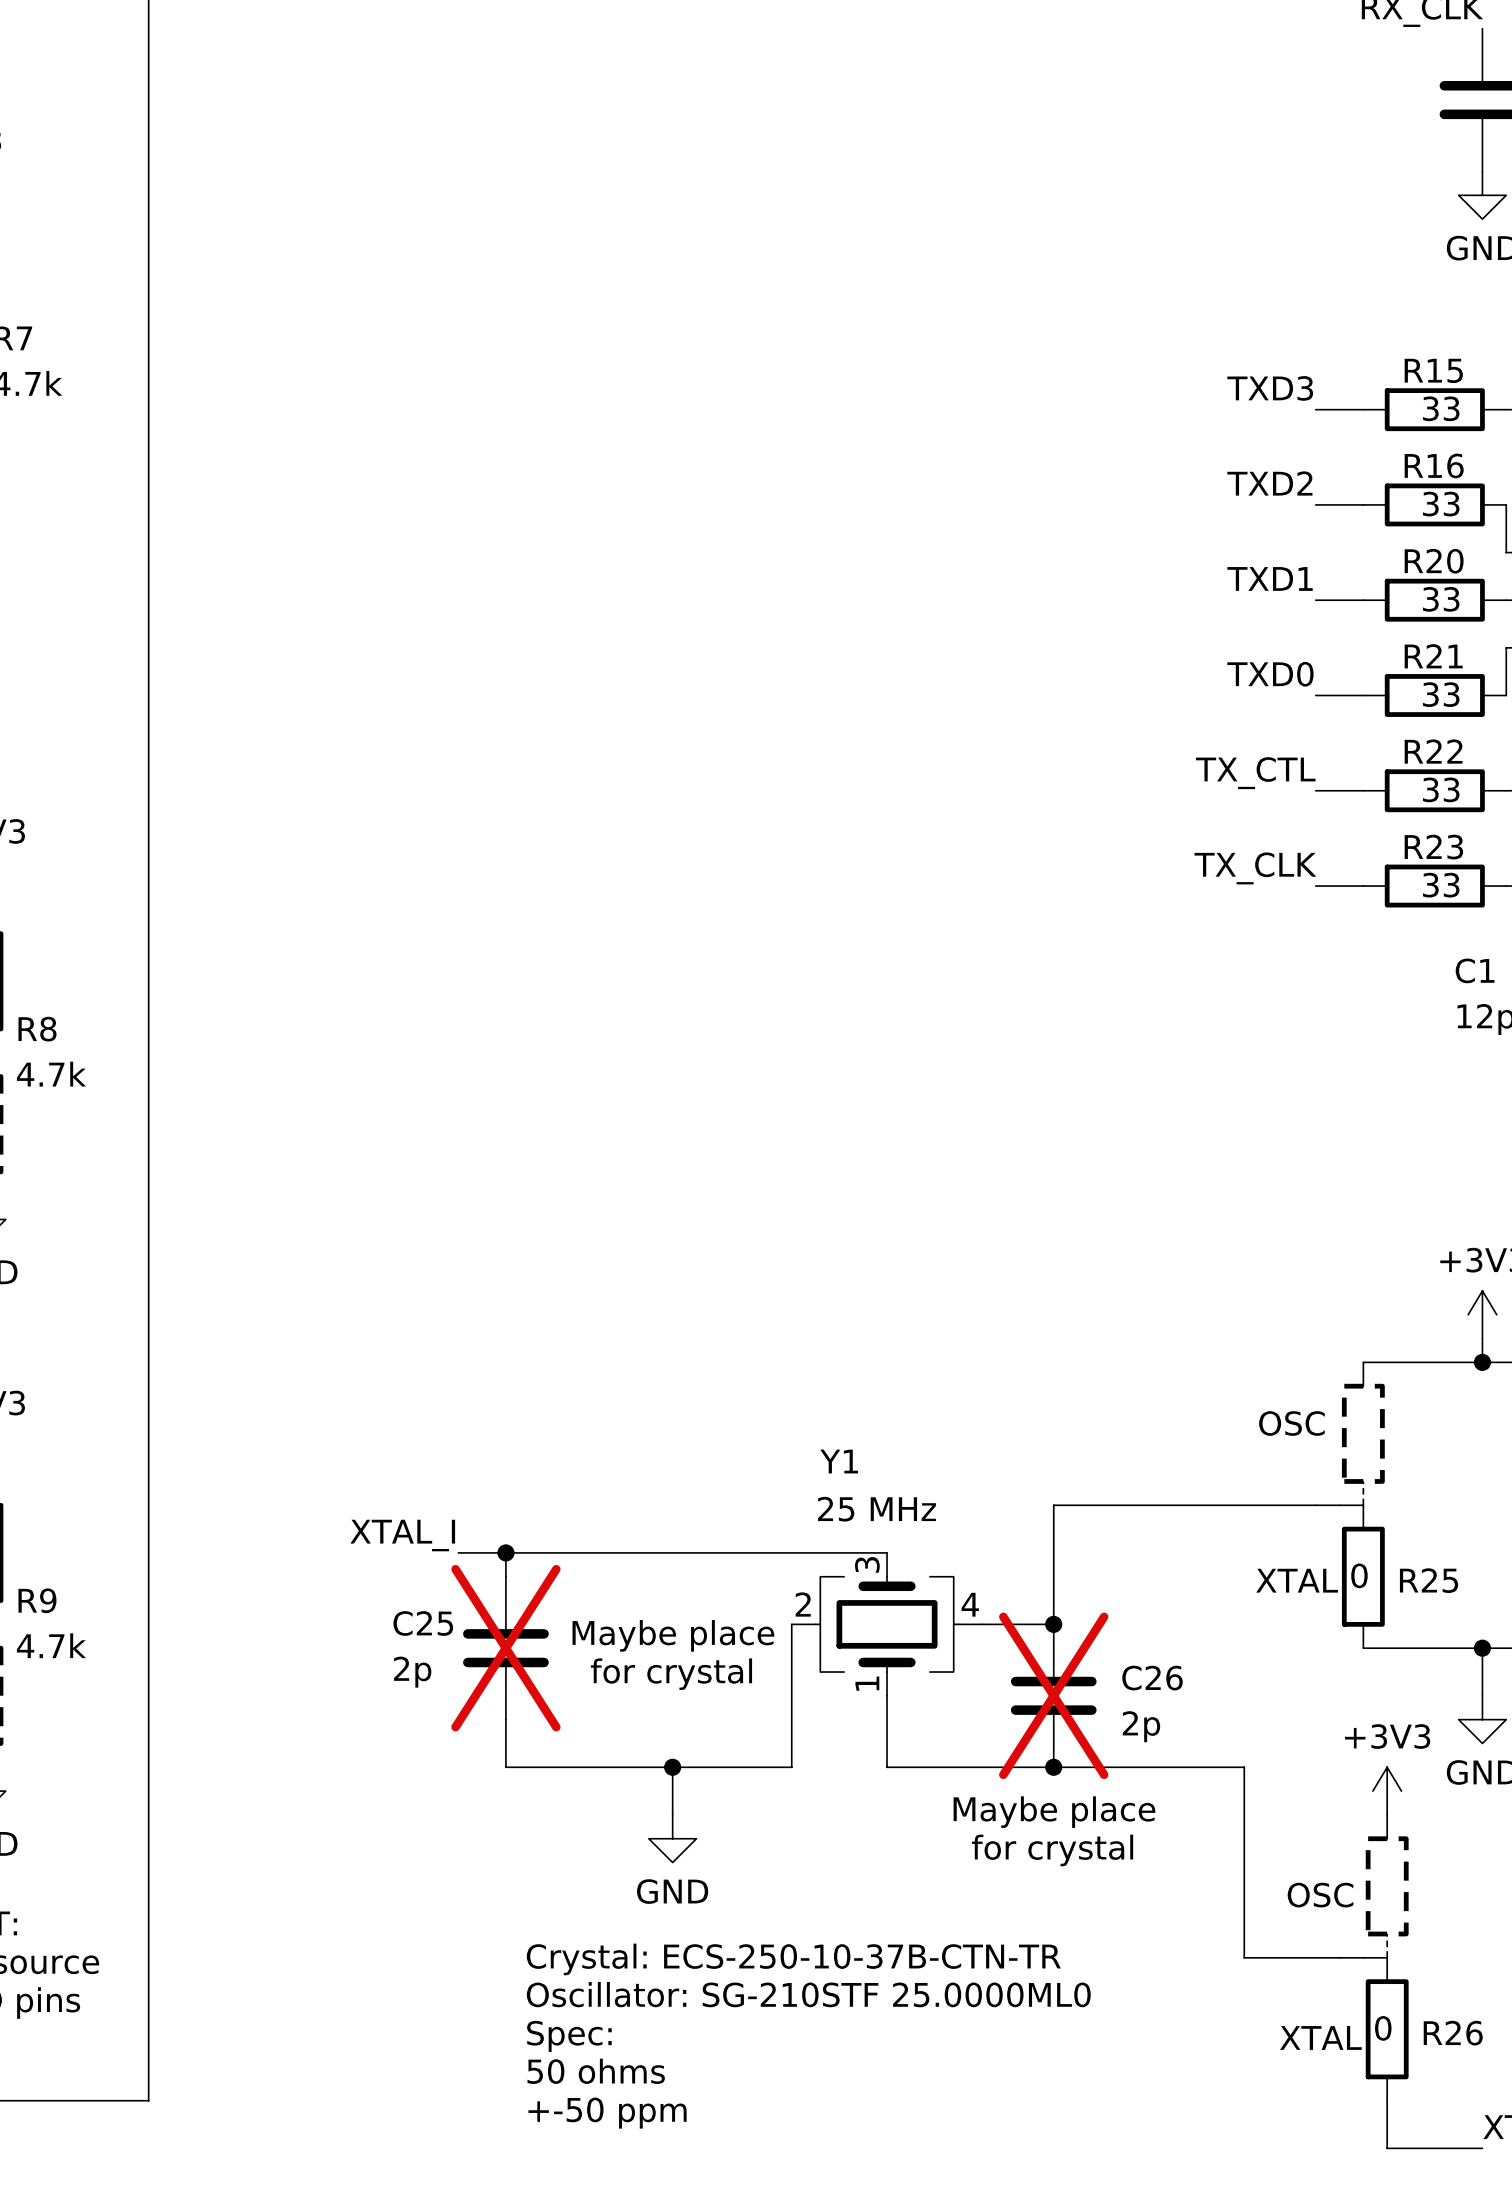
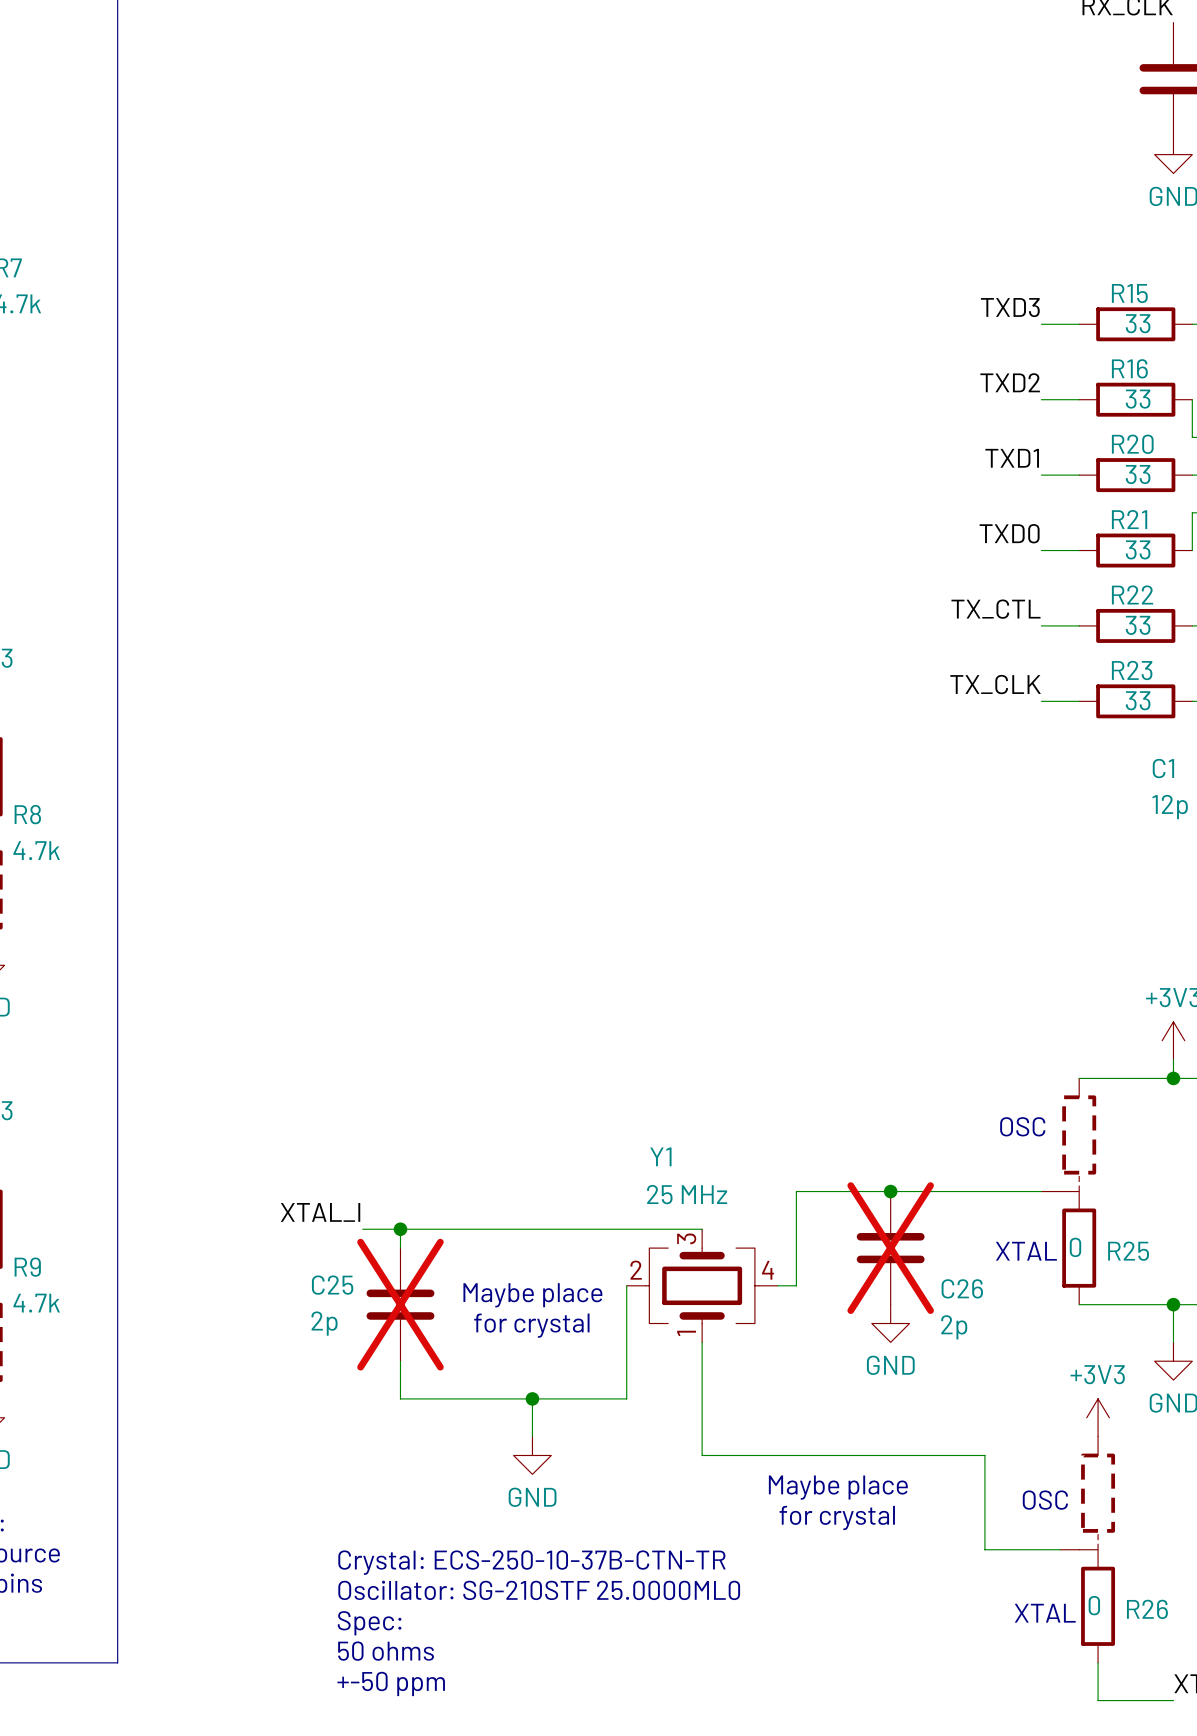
wire: (1053, 1505) (1053, 1624) (1006, 1624) -> (834, 1191) (796, 1191) (796, 1285)
junction: none -> (890, 1191)
junction: (1053, 1624) -> none
power symbol: none -> GND (890, 1323)
C26 name position: C26 (1152, 1678) -> C26 (962, 1288)
C26 position: (1053, 1695) -> (890, 1248)
C26 value position: 2p (1141, 1726) -> 2p (954, 1327)
wire: (887, 1767) (1244, 1767) (1244, 1838) -> (702, 1398) (702, 1455) (984, 1455)
junction: (1053, 1767) -> none
text position: Maybe place (1054, 1812) -> Maybe place (838, 1487)
text position: for crystal (1052, 1850) -> for crystal (837, 1517)
text position: Crystal: ECS-250-10-37B-CTN-TR (793, 1959) -> Crystal: ECS-250-10-37B-CTN-TR (531, 1562)
text position: Oscillator: SG-210STF 25.0000ML0 (808, 1994) -> Oscillator: SG-210STF 25.0000ML0 (539, 1590)
text position: Spec: (569, 2036) -> Spec: (369, 1623)
text position: 50 ohms (596, 2071) -> 50 ohms (386, 1651)
text position: +-50 ppm (607, 2113) -> +-50 ppm (391, 1683)

